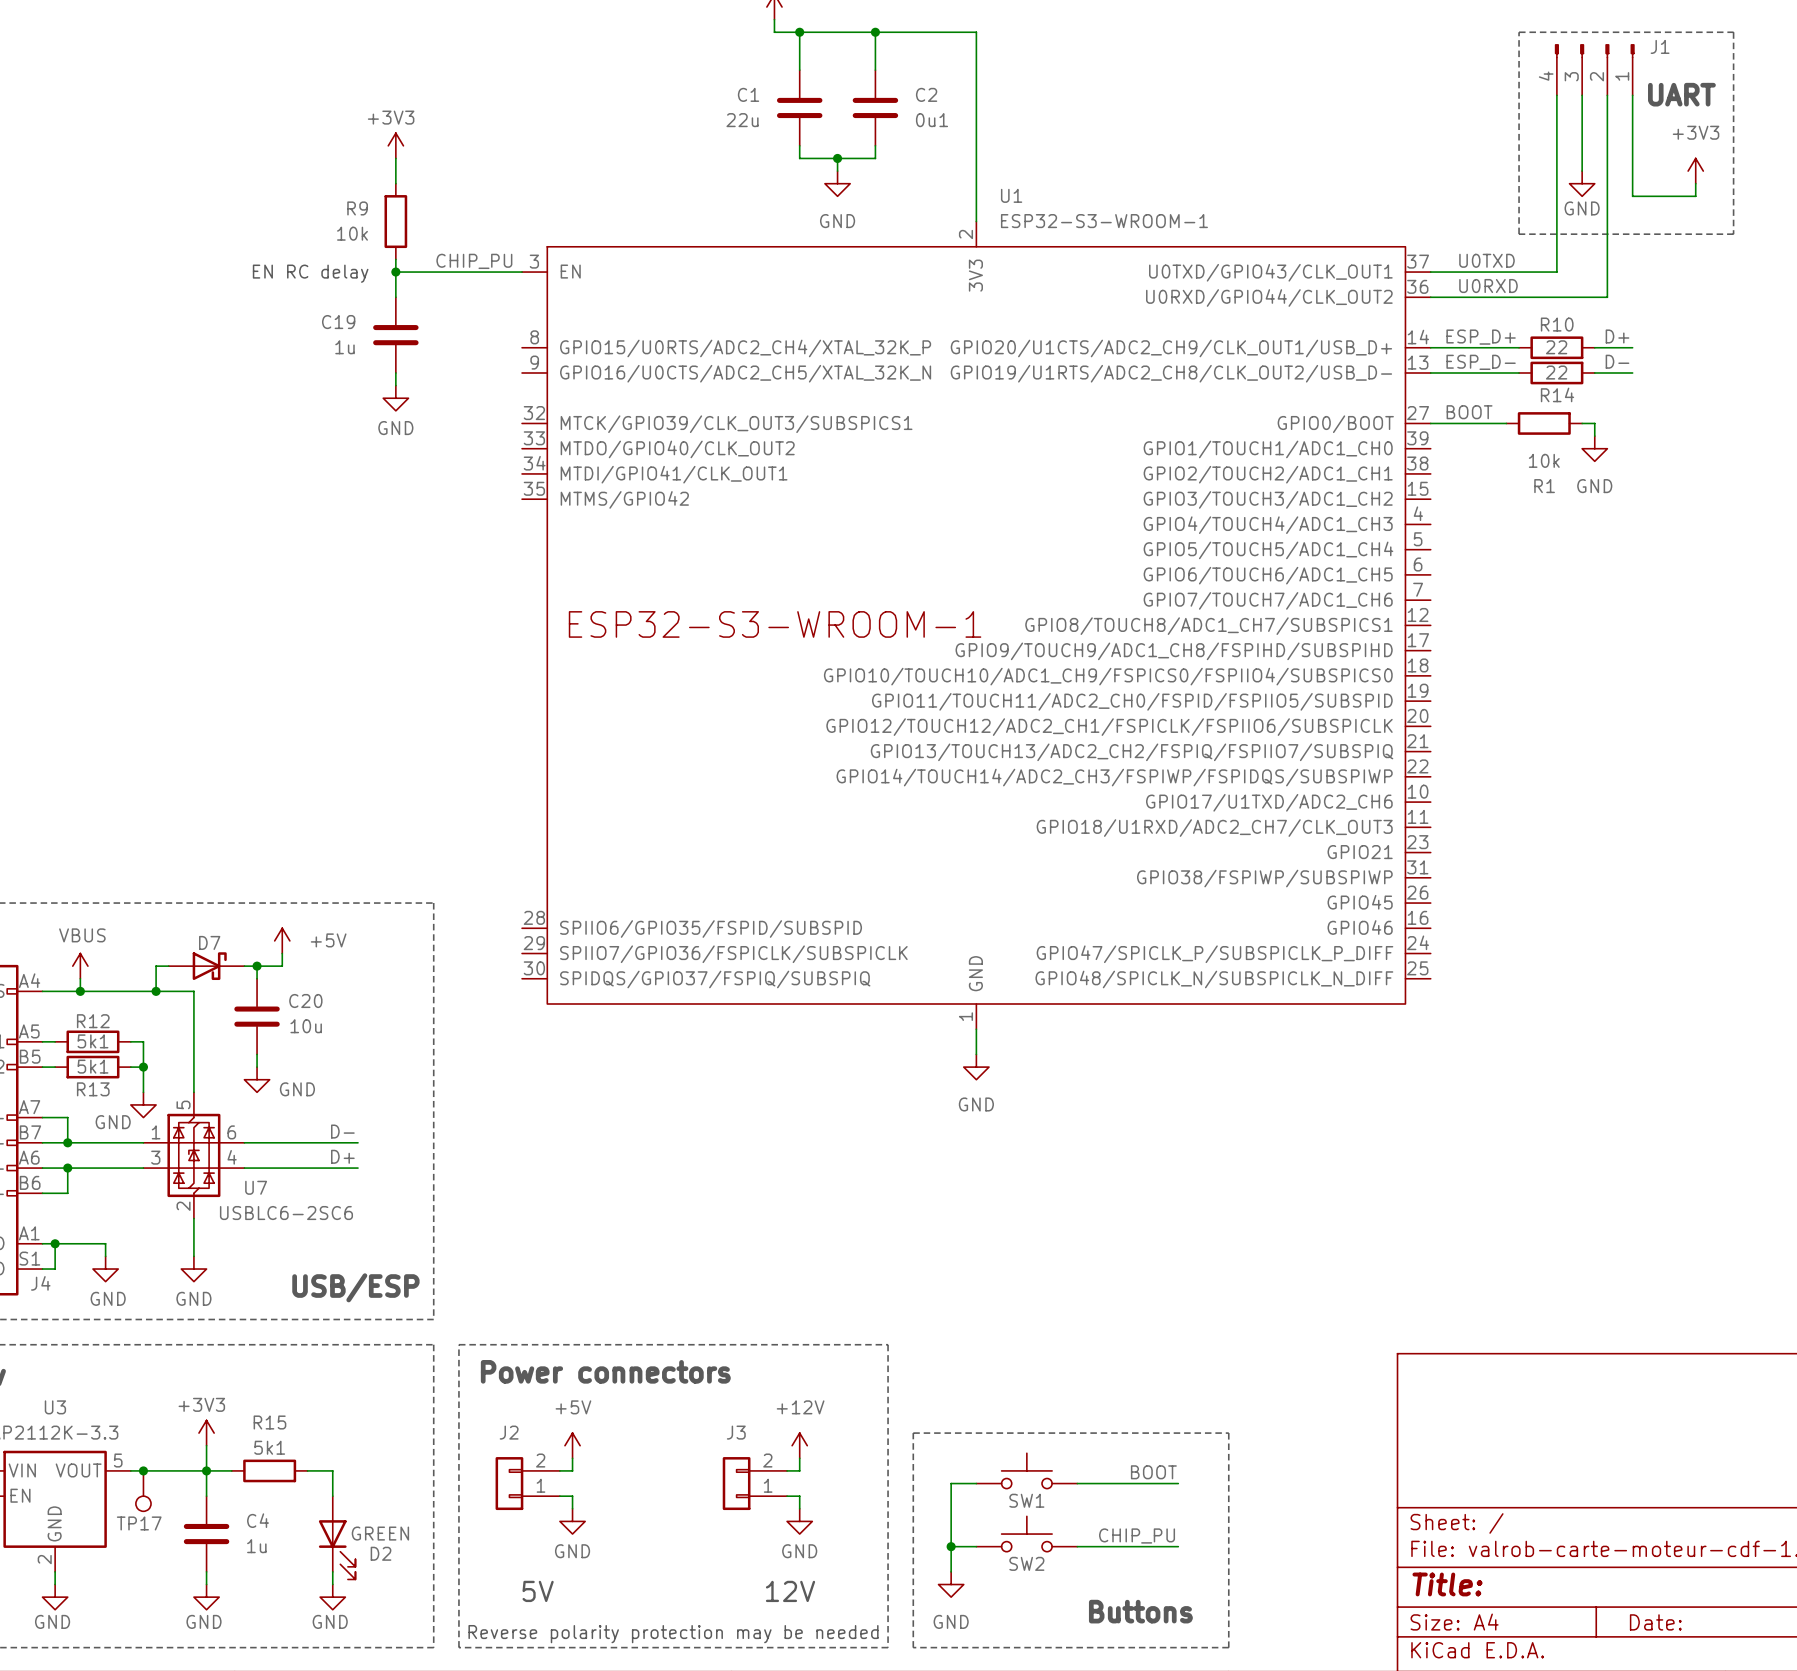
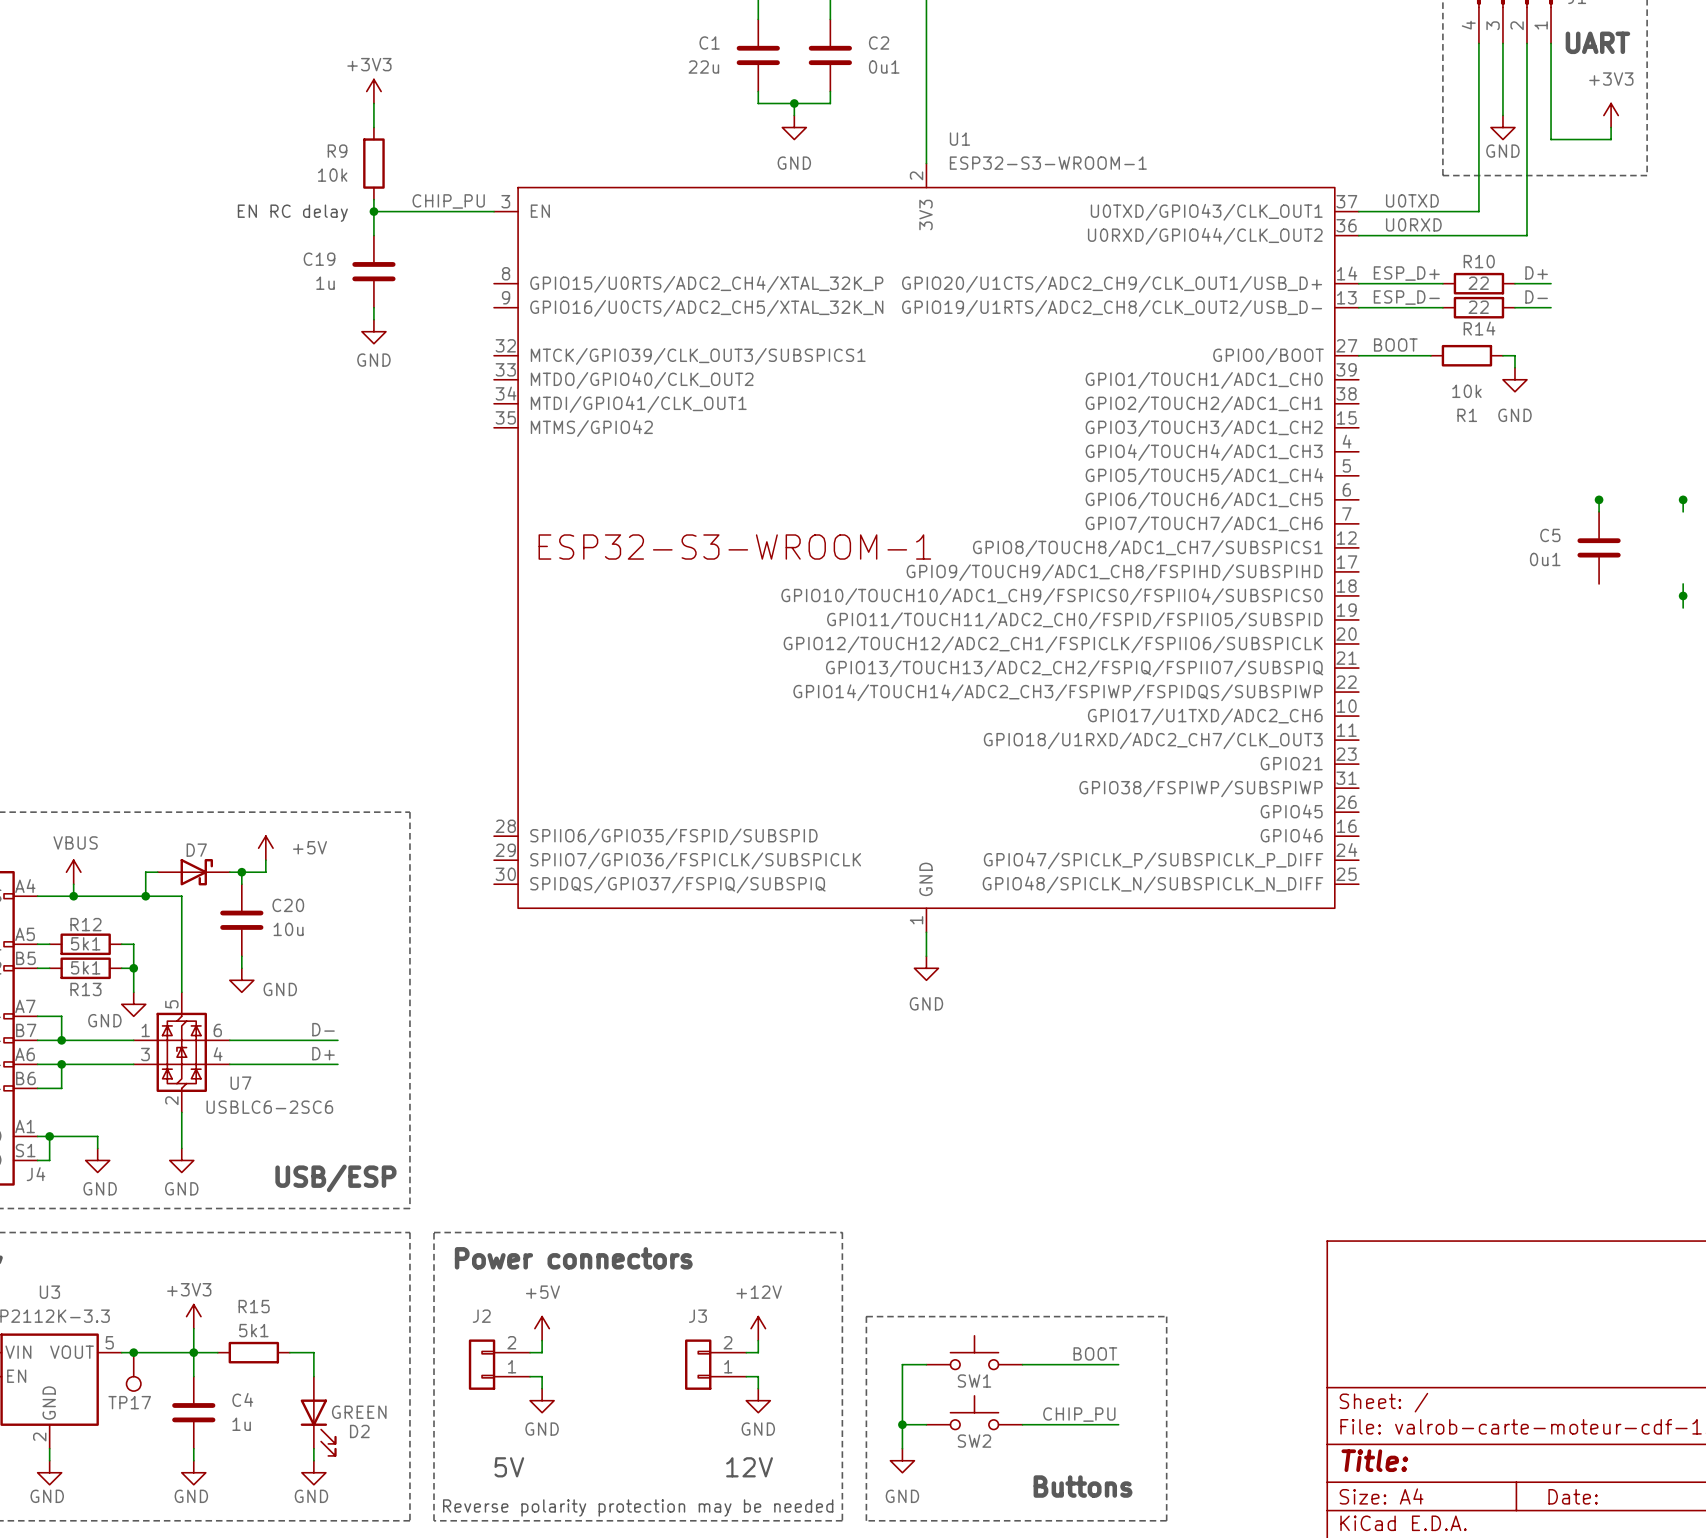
wire: none -> (1599, 499) (1599, 511)
junction: none -> (1599, 499)
wire: none -> (1683, 499) (1683, 511)
junction: none -> (1683, 499)
C5: none -> 0u1 (1599, 547)
wire: none -> (1683, 583) (1683, 607)
junction: none -> (1683, 595)

